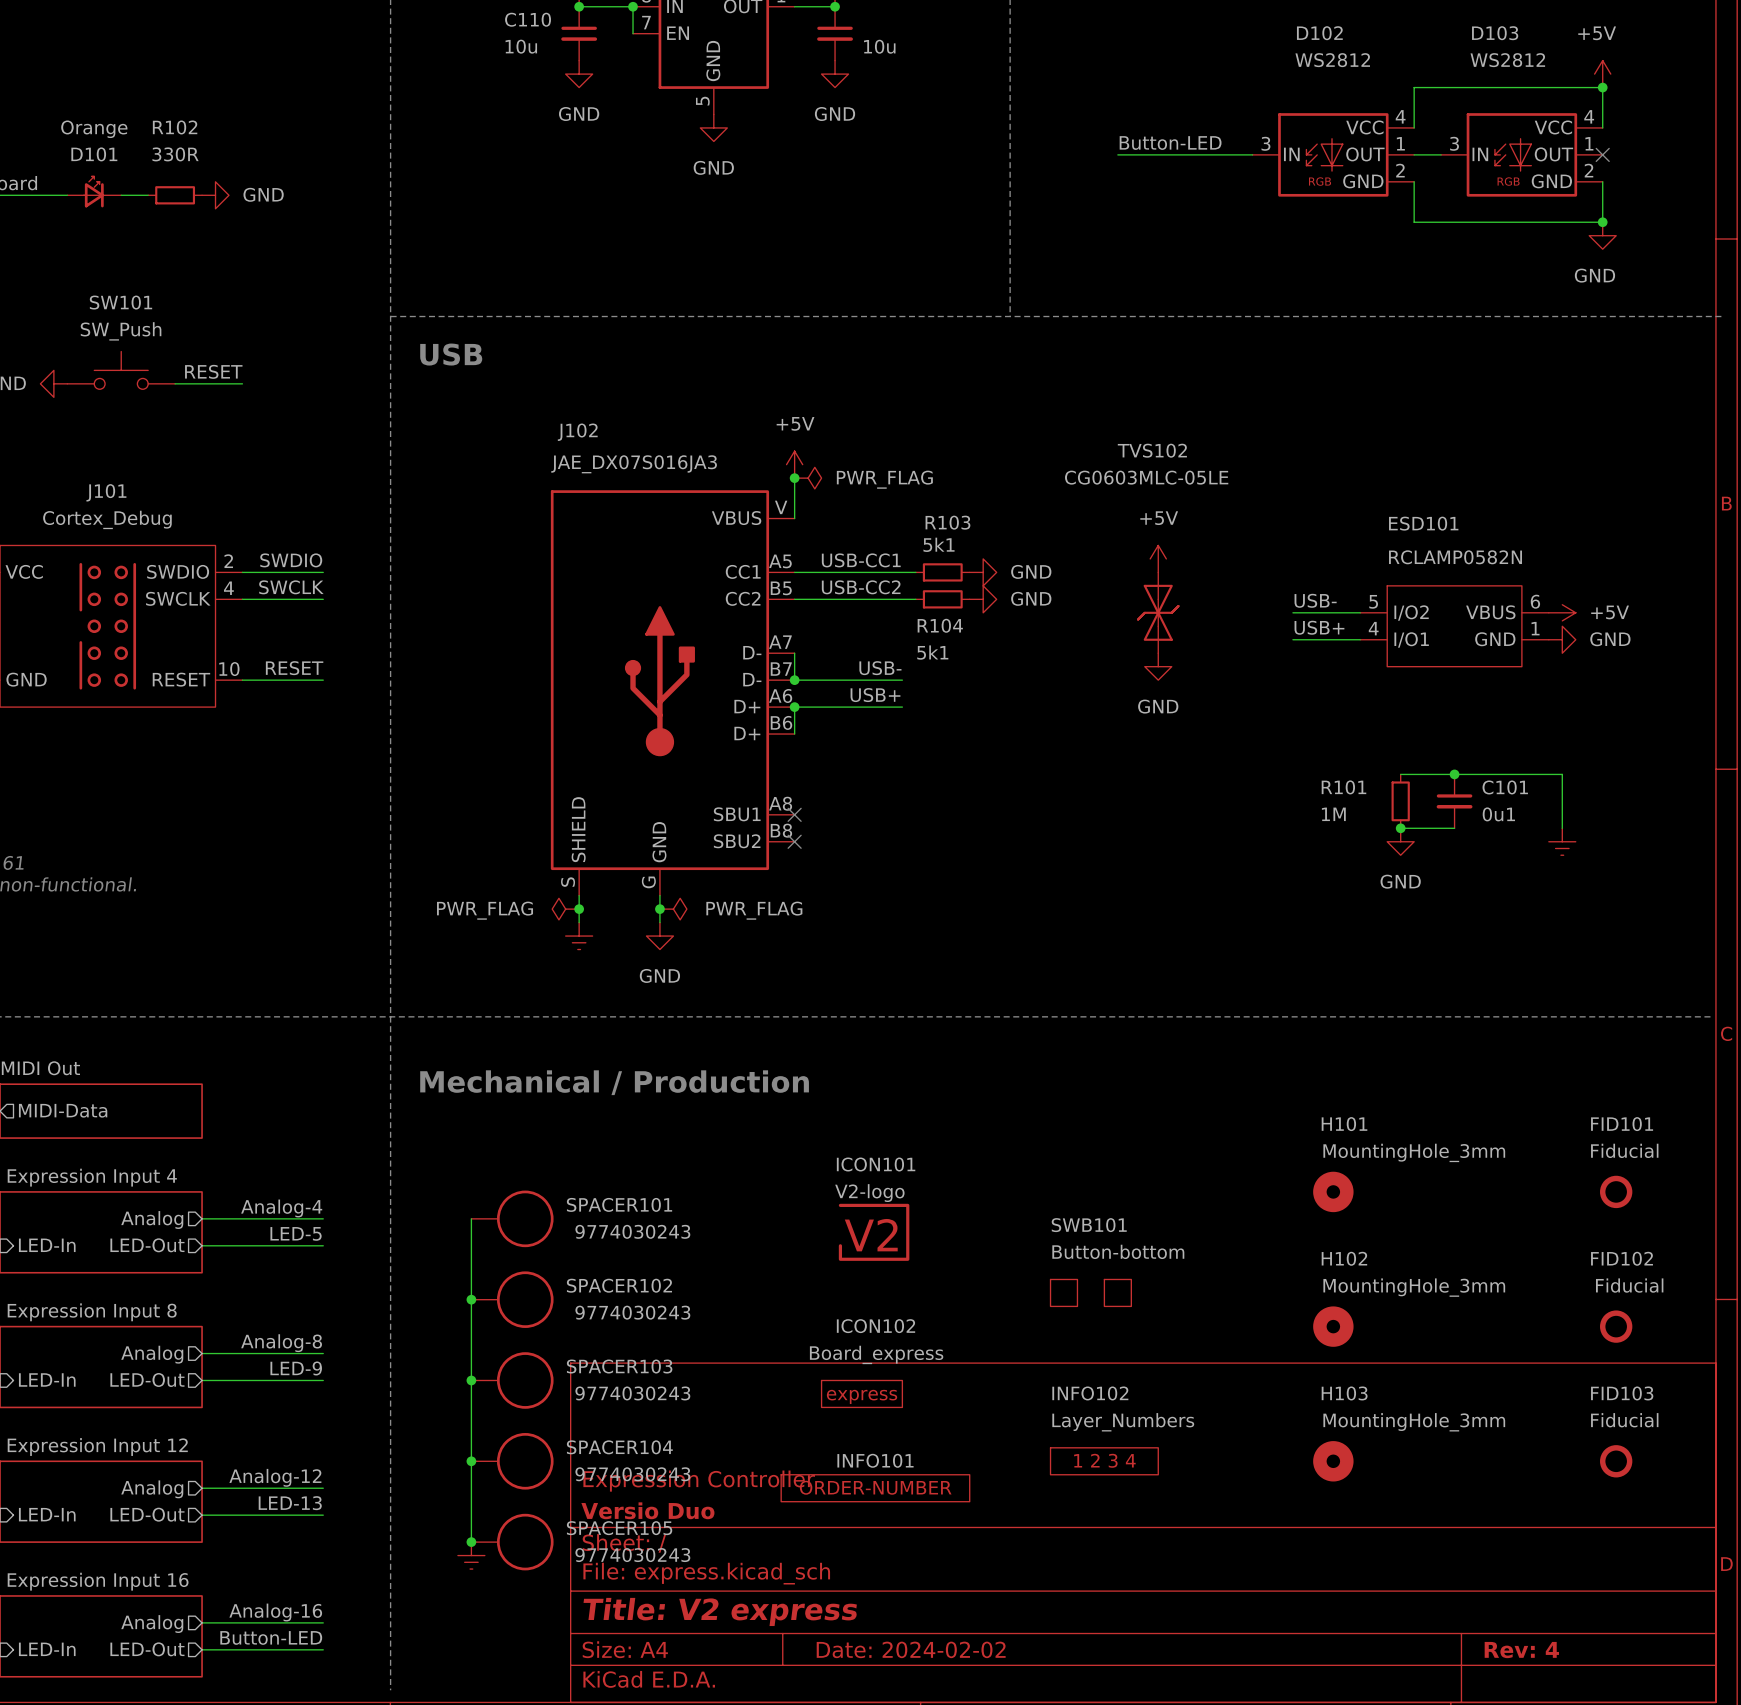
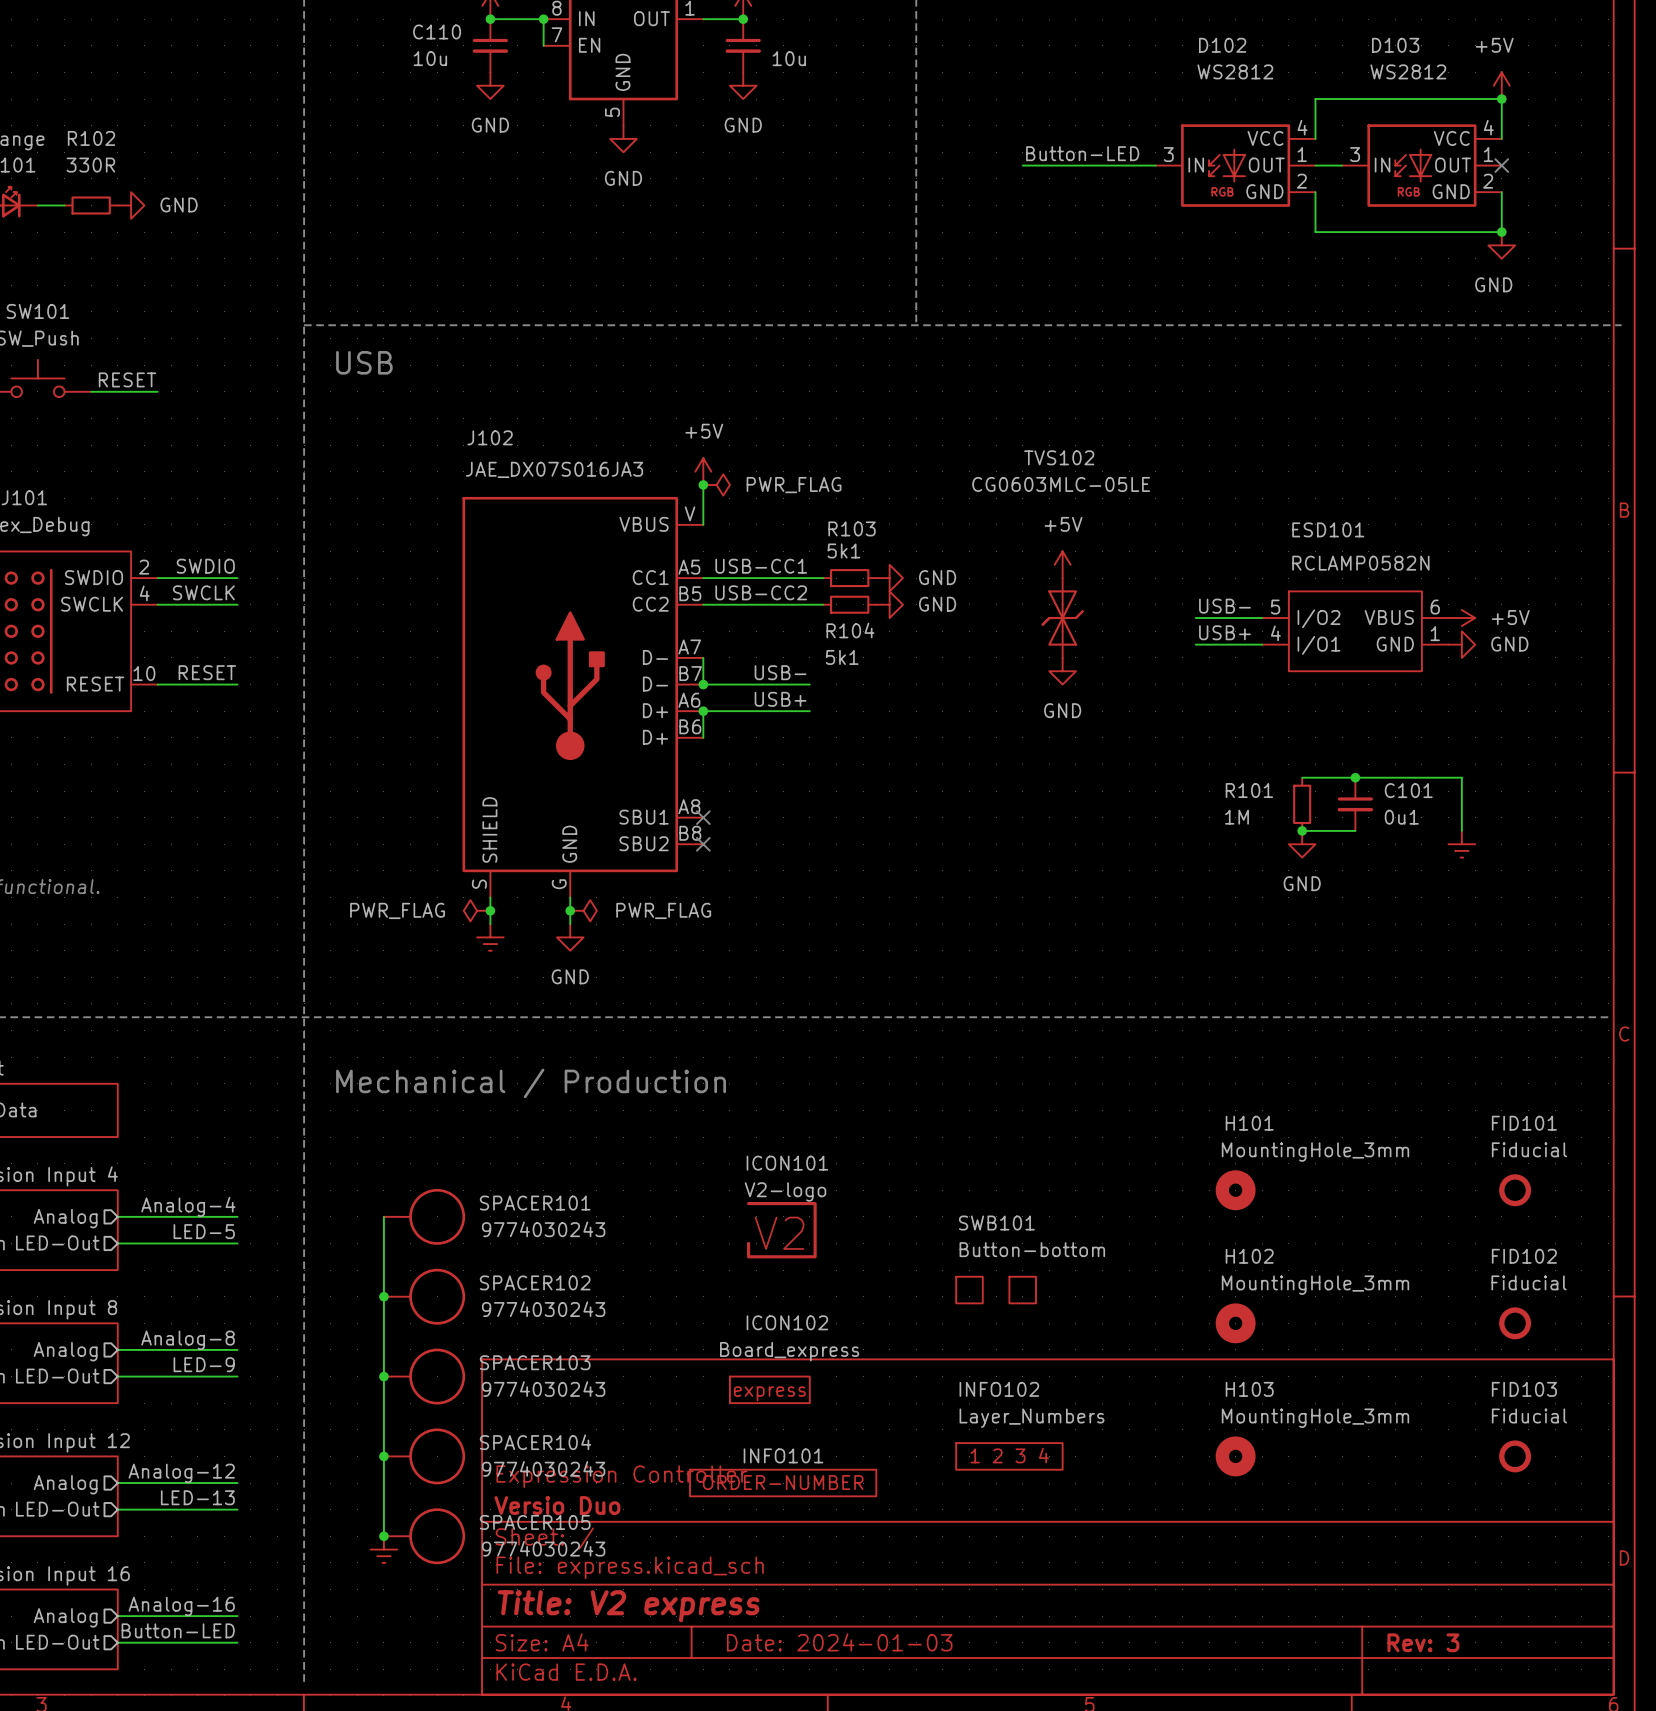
title block: Date: 2024-02-02 (911, 1649) -> Date: 2024-01-03 (839, 1642)
title block: Rev: 4 (1521, 1650) -> Rev: 3 (1423, 1642)

